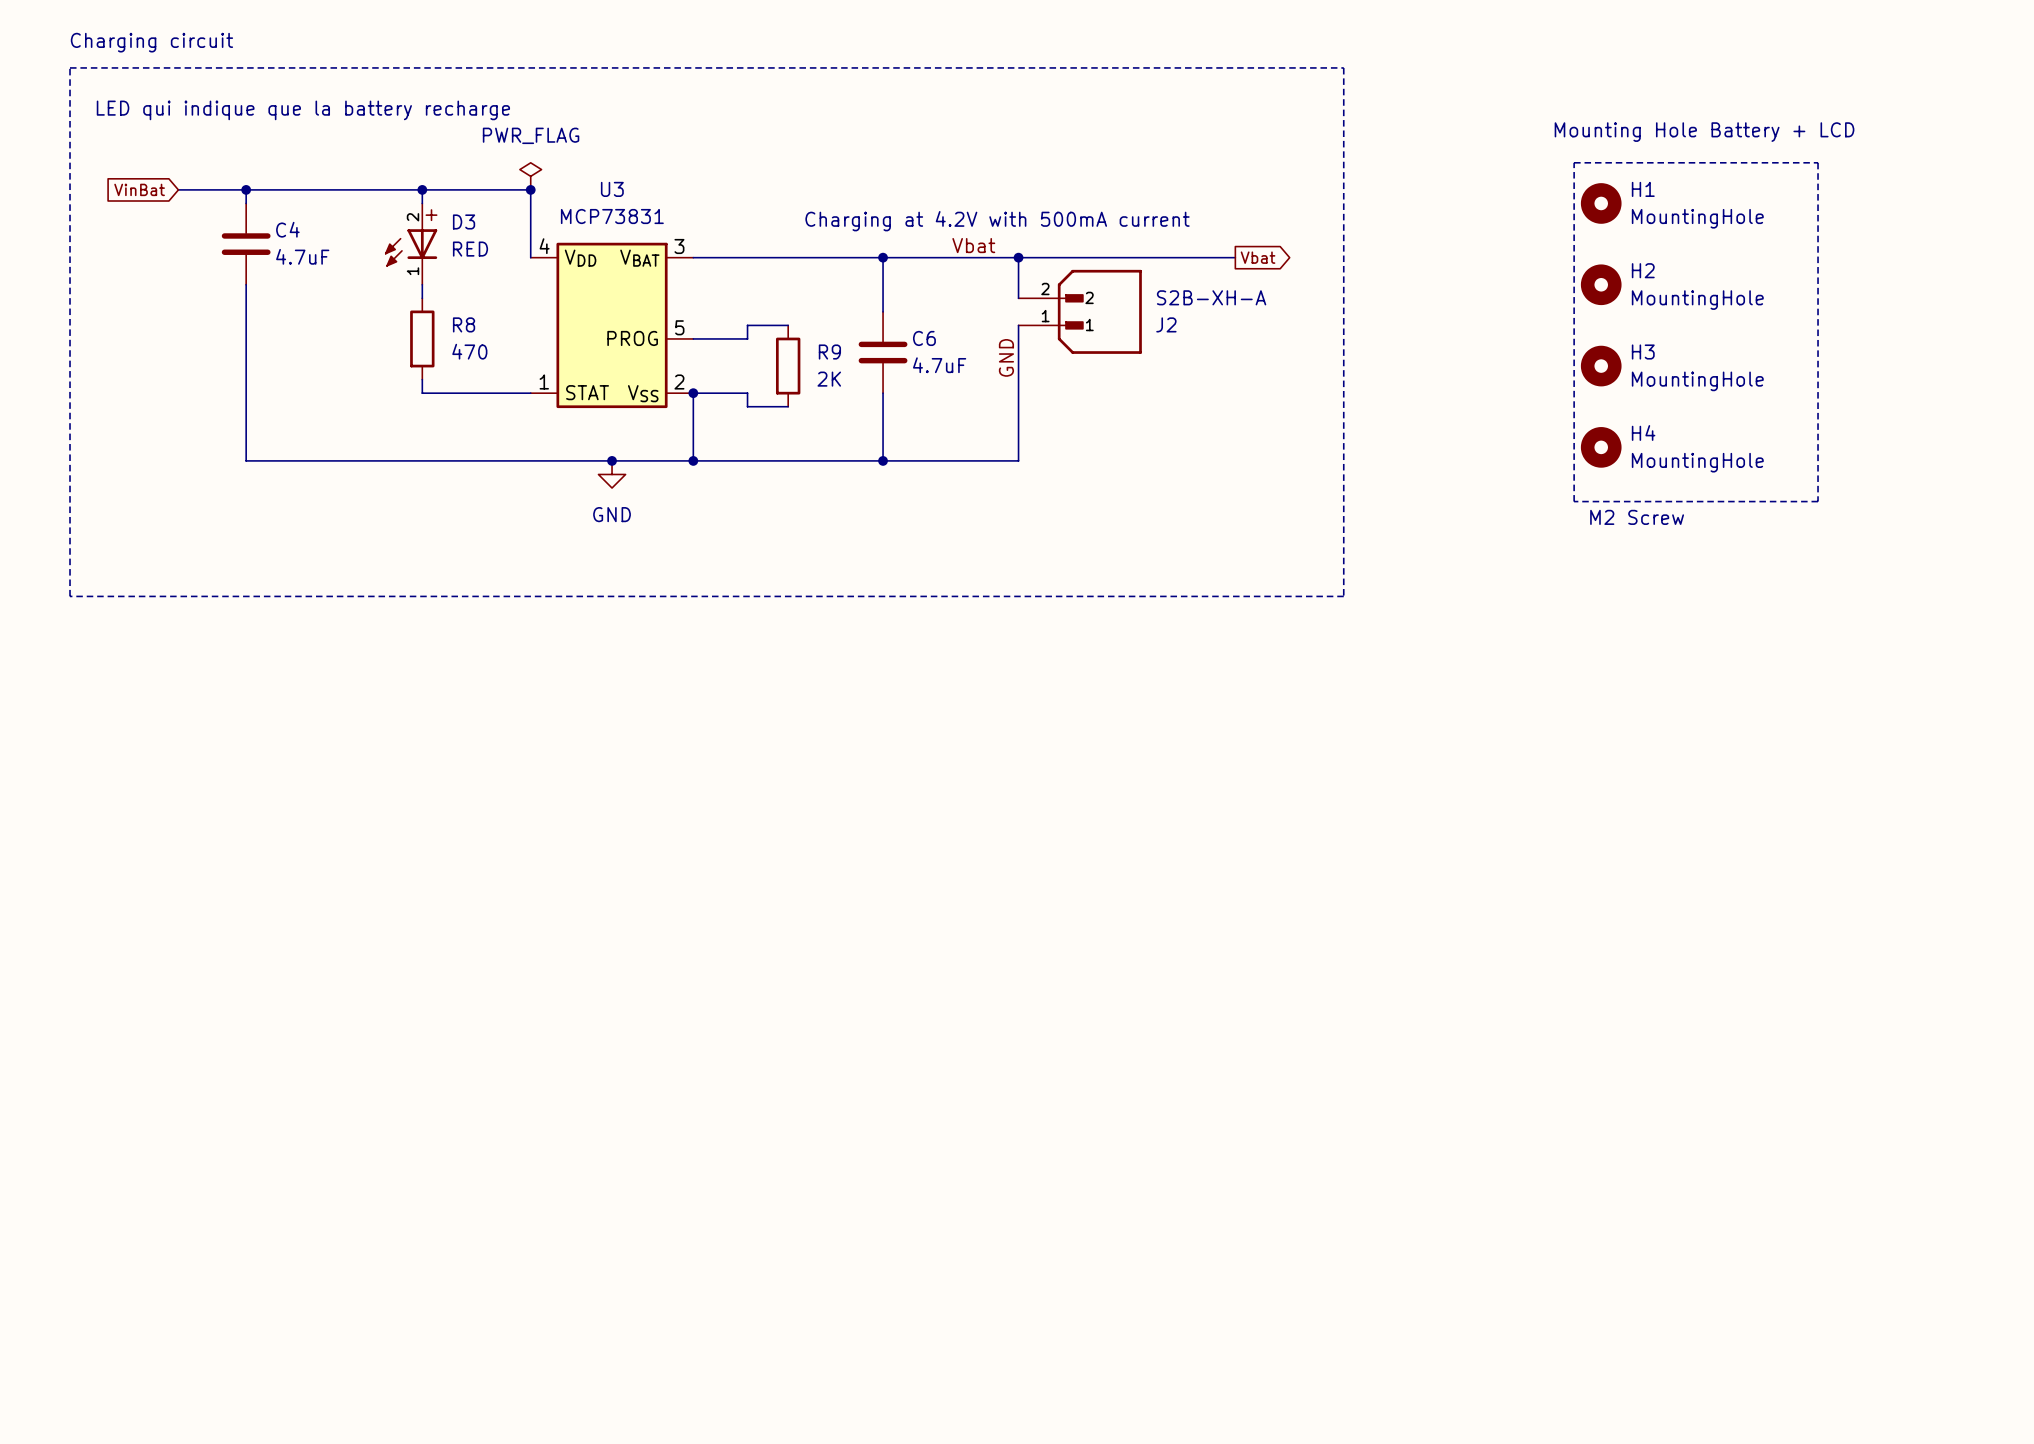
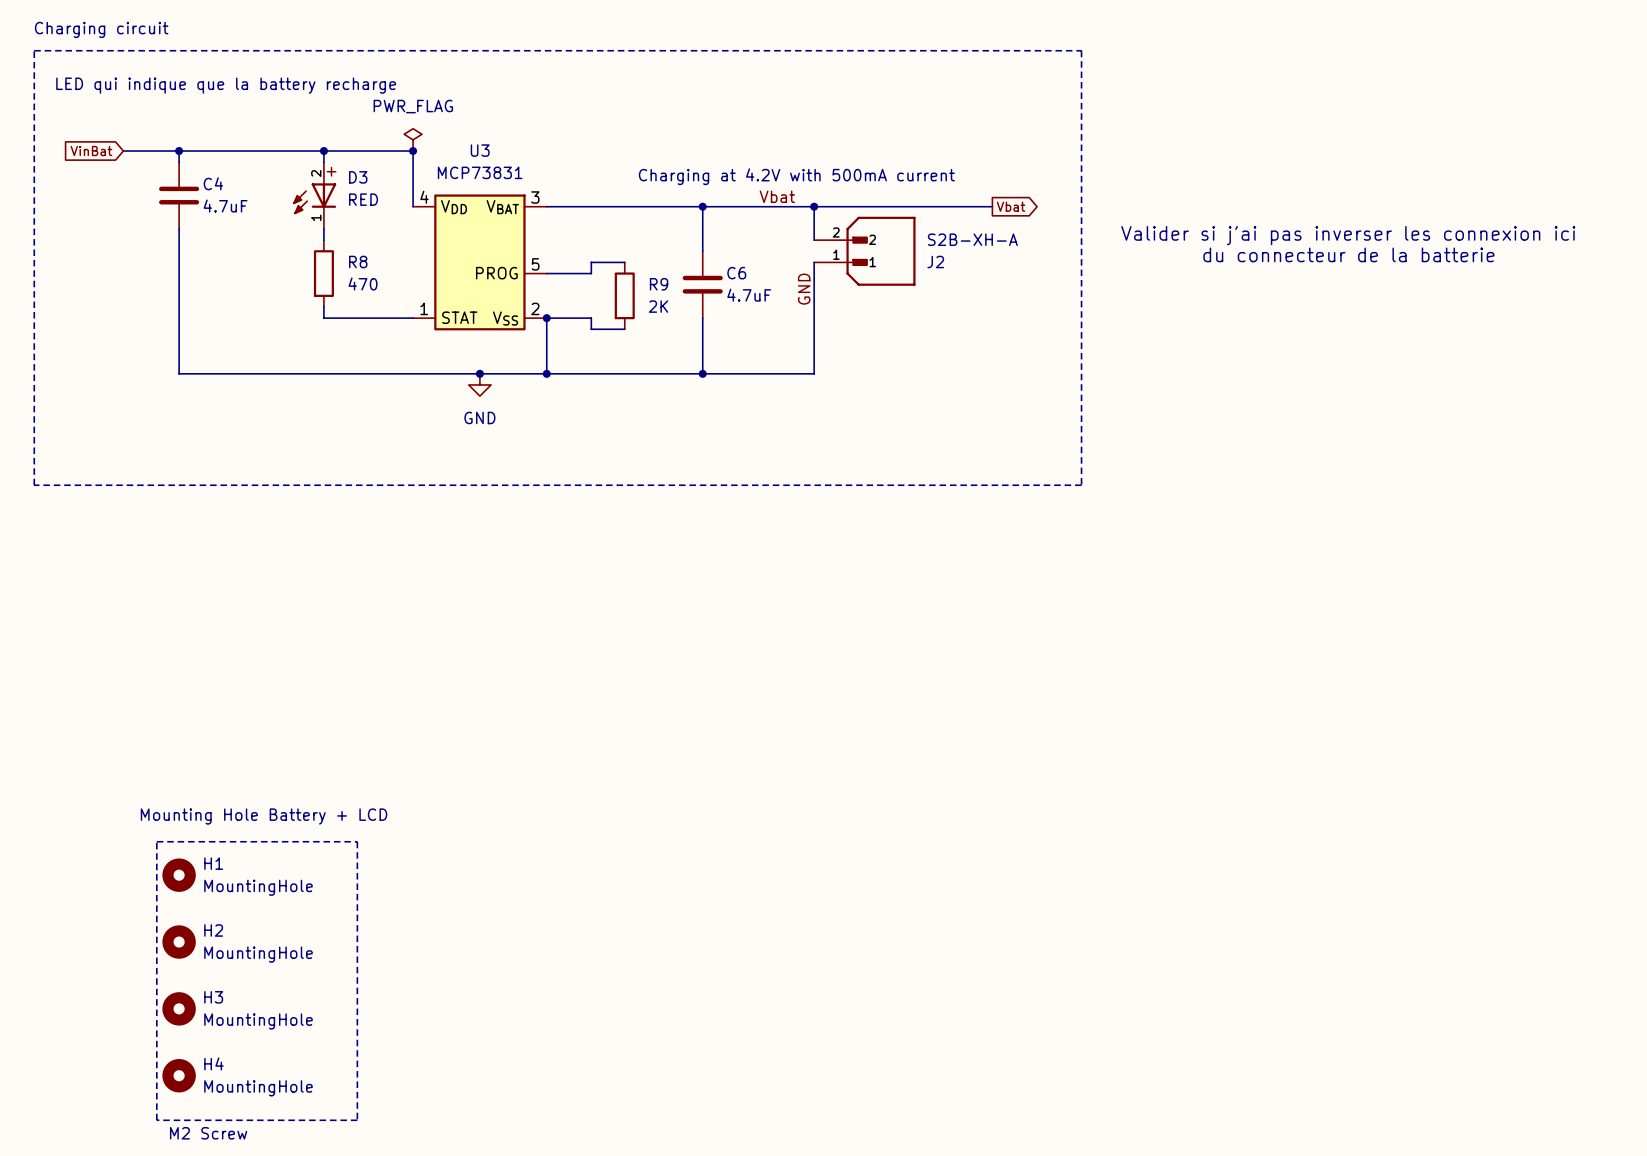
text: Mounting Hole Battery + LCD (1704, 132) -> none
line: (1574, 162) (1818, 162) (1818, 501) (1574, 501) (1574, 162) -> none
H1 position: (1601, 203) -> (179, 875)
H2 position: (1601, 284) -> (179, 942)
text: none -> Valider si j'ai pas inverser les connexion ici (1348, 235)
text: none -> du connecteur de la batterie (1348, 254)
H3 position: (1601, 366) -> (179, 1008)
H4 position: (1601, 447) -> (179, 1075)
text: M2 Screw (1637, 517) -> none
text: none -> Mounting Hole Battery + LCD (264, 816)
line: none -> (156, 841) (357, 841) (357, 1120) (156, 1120) (156, 841)
text: none -> M2 Screw (208, 1133)

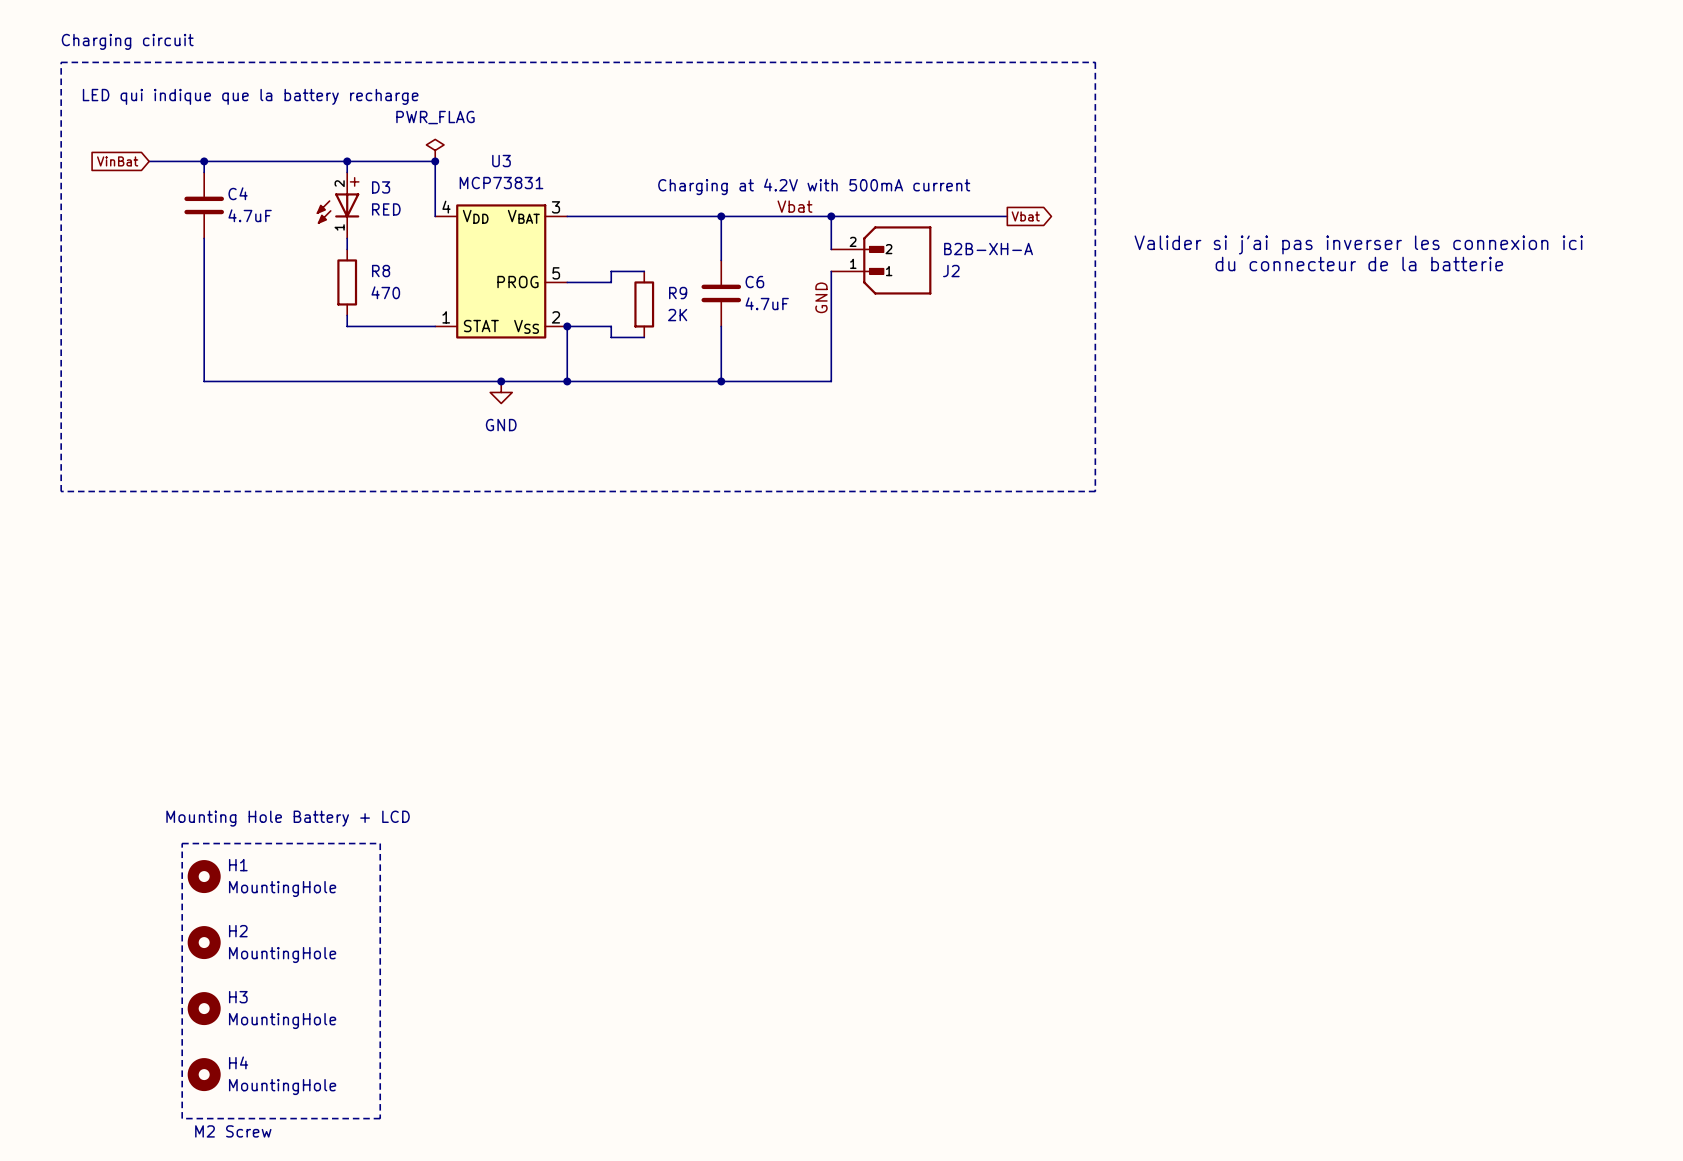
J2 value: S2B-XH-A (972, 239) -> B2B-XH-A (988, 249)

